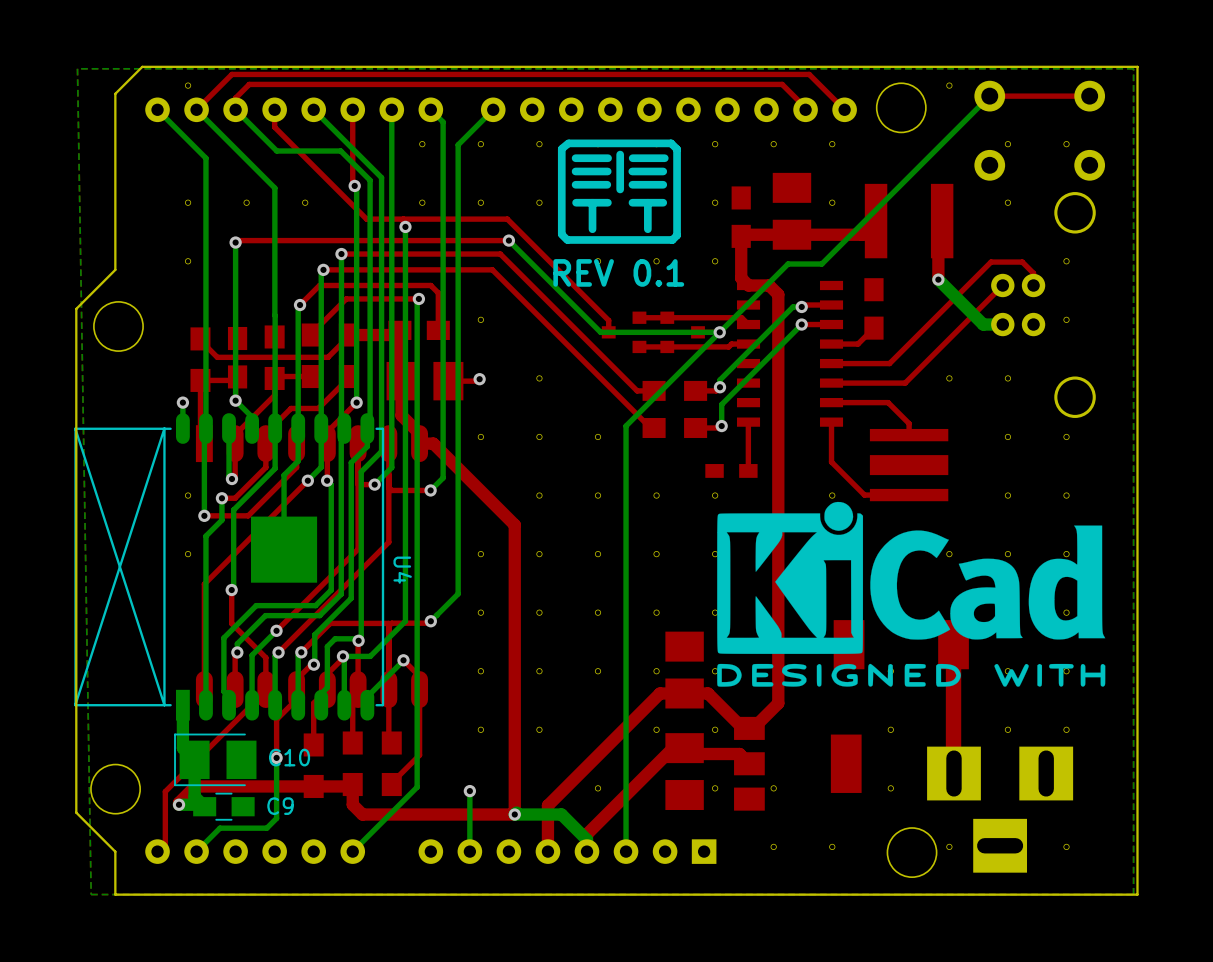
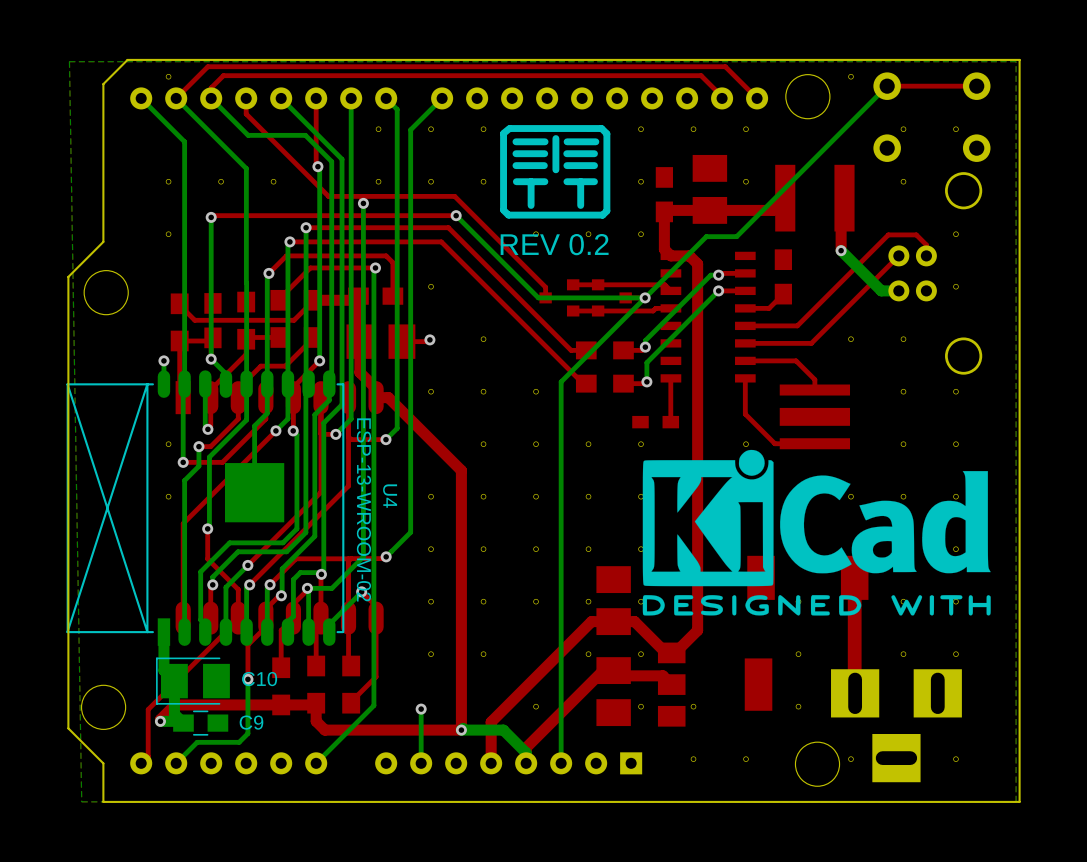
text: REV 0.1 (618, 272) -> REV 0.2 (554, 244)
U4 value: none -> ESP-13-WROOM-02 (363, 509)
U4 name position: U4 (402, 570) -> U4 (390, 496)

